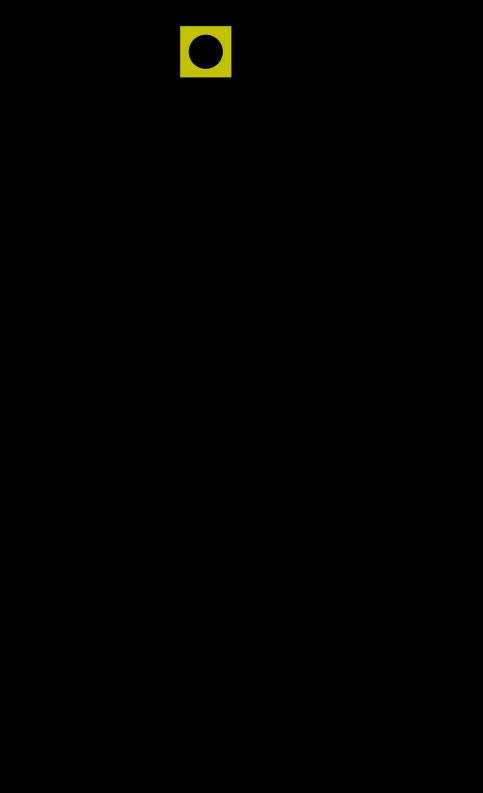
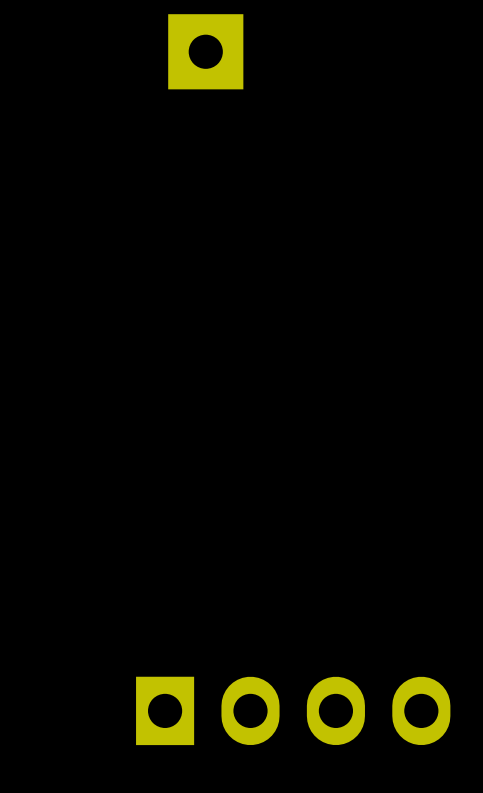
part footprint: [180, 26, 232, 78] -> [168, 14, 244, 90]
part: none -> (293, 710)

